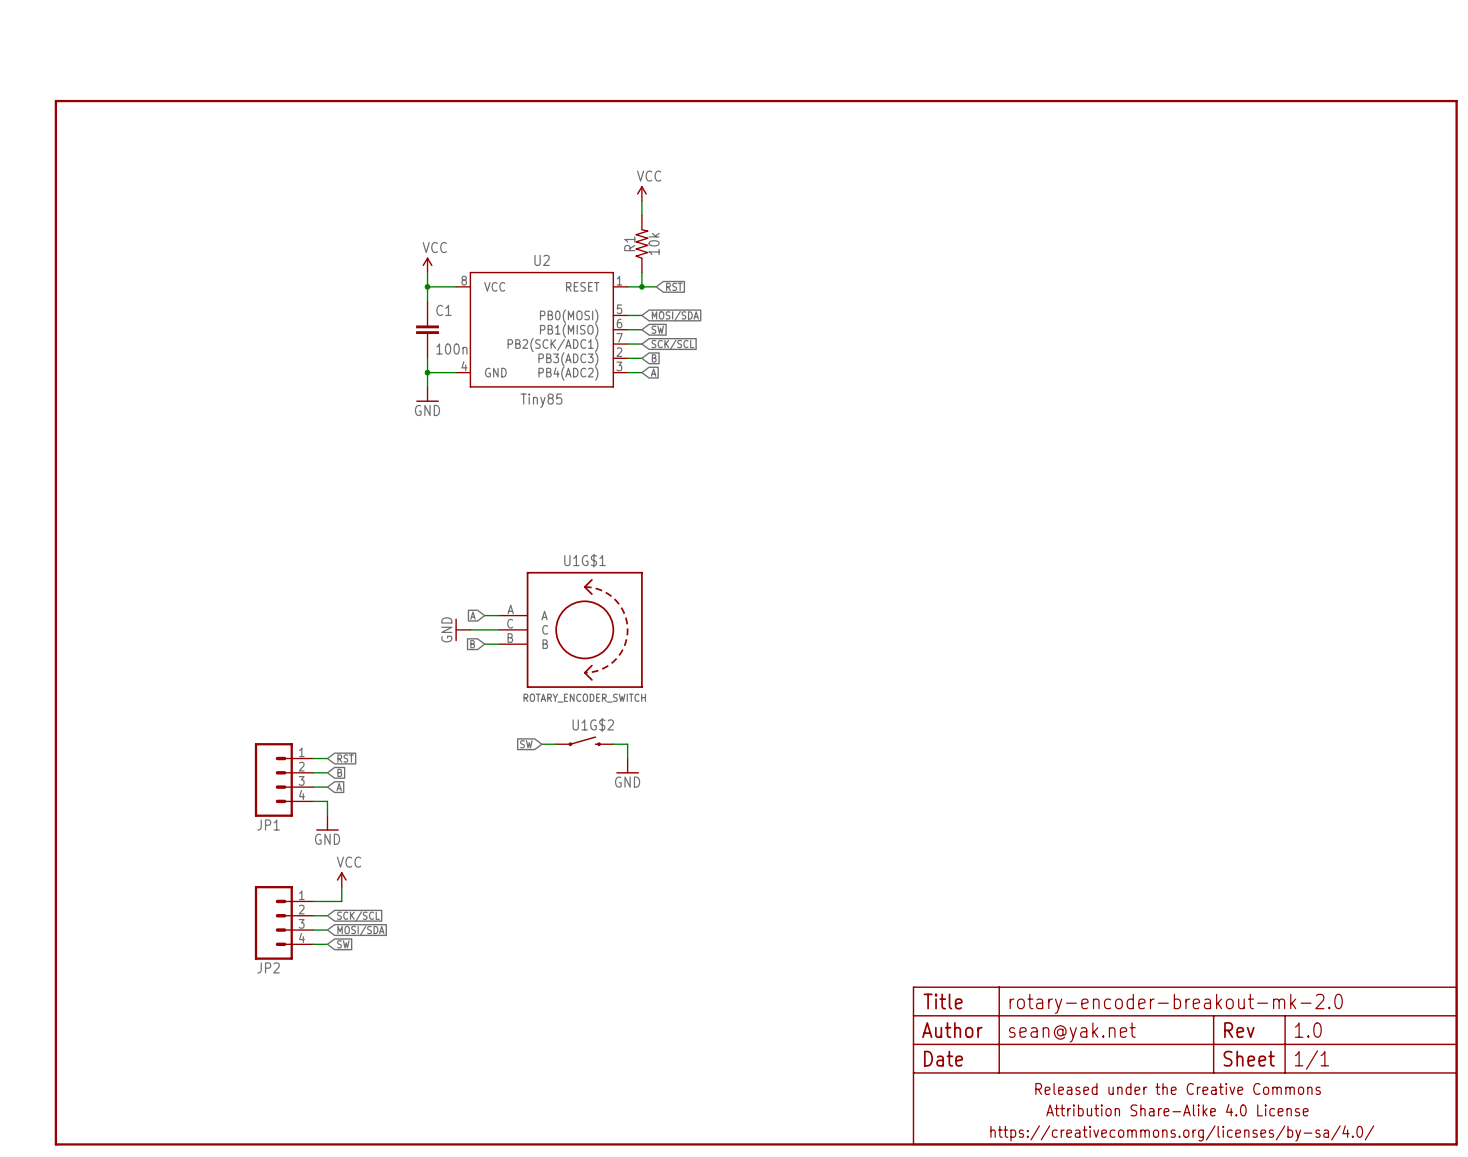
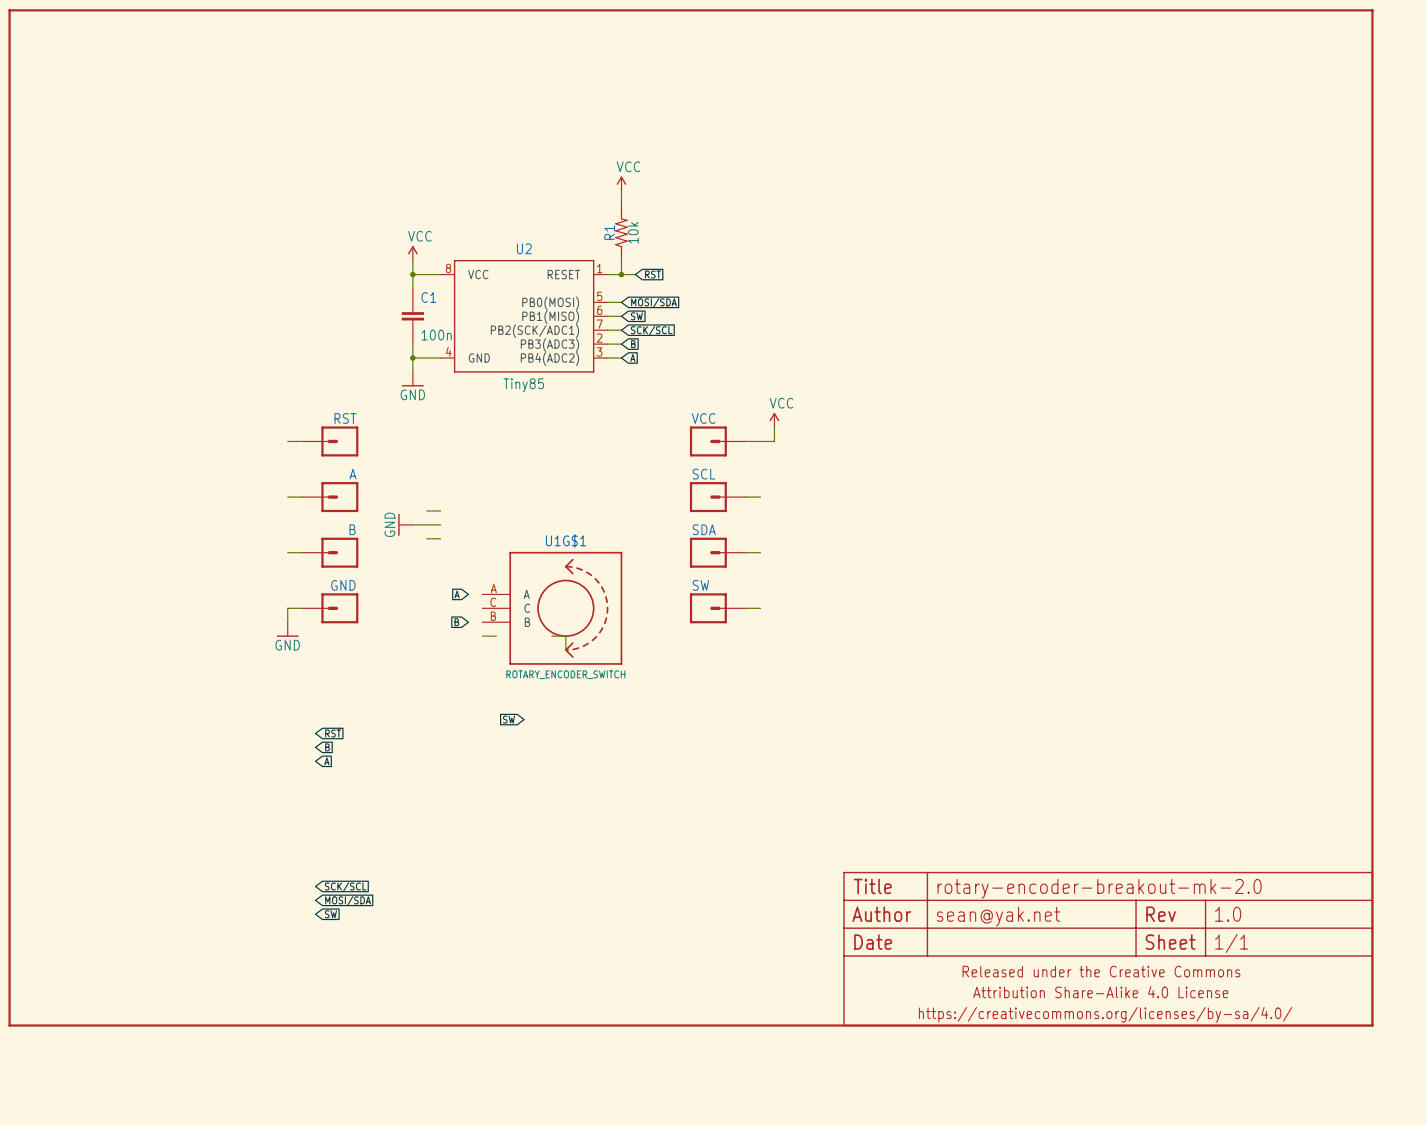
power symbol: none -> VCC (774, 420)
wire: none -> (774, 427) (774, 441) (746, 441)
wire: none -> (287, 441) (301, 441)
RST: none -> (329, 441)
VCC: none -> (718, 441)
wire: none -> (287, 497) (301, 497)
A: none -> (329, 497)
SCL: none -> (718, 497)
wire: none -> (746, 497) (760, 497)
power symbol: none -> GND (405, 524)
wire: none -> (287, 552) (301, 552)
B: none -> (329, 552)
SDA: none -> (718, 552)
wire: none -> (746, 552) (760, 552)
wire: (484, 615) (498, 615) -> (426, 510) (440, 510)
part position: (756, 622) -> (691, 517)
wire: none -> (301, 608) (287, 608) (287, 622)
GND: none -> (329, 608)
power symbol: GND (462, 629) -> none
wire: (470, 629) (498, 629) -> (412, 524) (440, 524)
SW: none -> (718, 608)
wire: none -> (746, 608) (760, 608)
wire: (484, 644) (498, 644) -> (426, 538) (440, 538)
power symbol: none -> GND (287, 629)
U1G$2: (584, 741) -> none
wire: (541, 744) (556, 744) -> (482, 636) (496, 636)
wire: (613, 744) (627, 744) (627, 758) -> (551, 636) (565, 636) (565, 650)
wire: (313, 758) (327, 758) -> none
power symbol: GND (627, 766) -> none
wire: (313, 772) (327, 772) -> none
JP1: (284, 779) -> none
wire: (313, 787) (327, 787) -> none
wire: (313, 801) (327, 801) (327, 815) -> none
power symbol: GND (327, 823) -> none
power symbol: VCC (341, 879) -> none
wire: (341, 887) (341, 901) (313, 901) -> none
wire: (313, 915) (327, 915) -> none
JP2: (284, 922) -> none
wire: (313, 930) (327, 930) -> none
wire: (313, 944) (327, 944) -> none
part position: (1185, 1065) -> (1108, 949)

